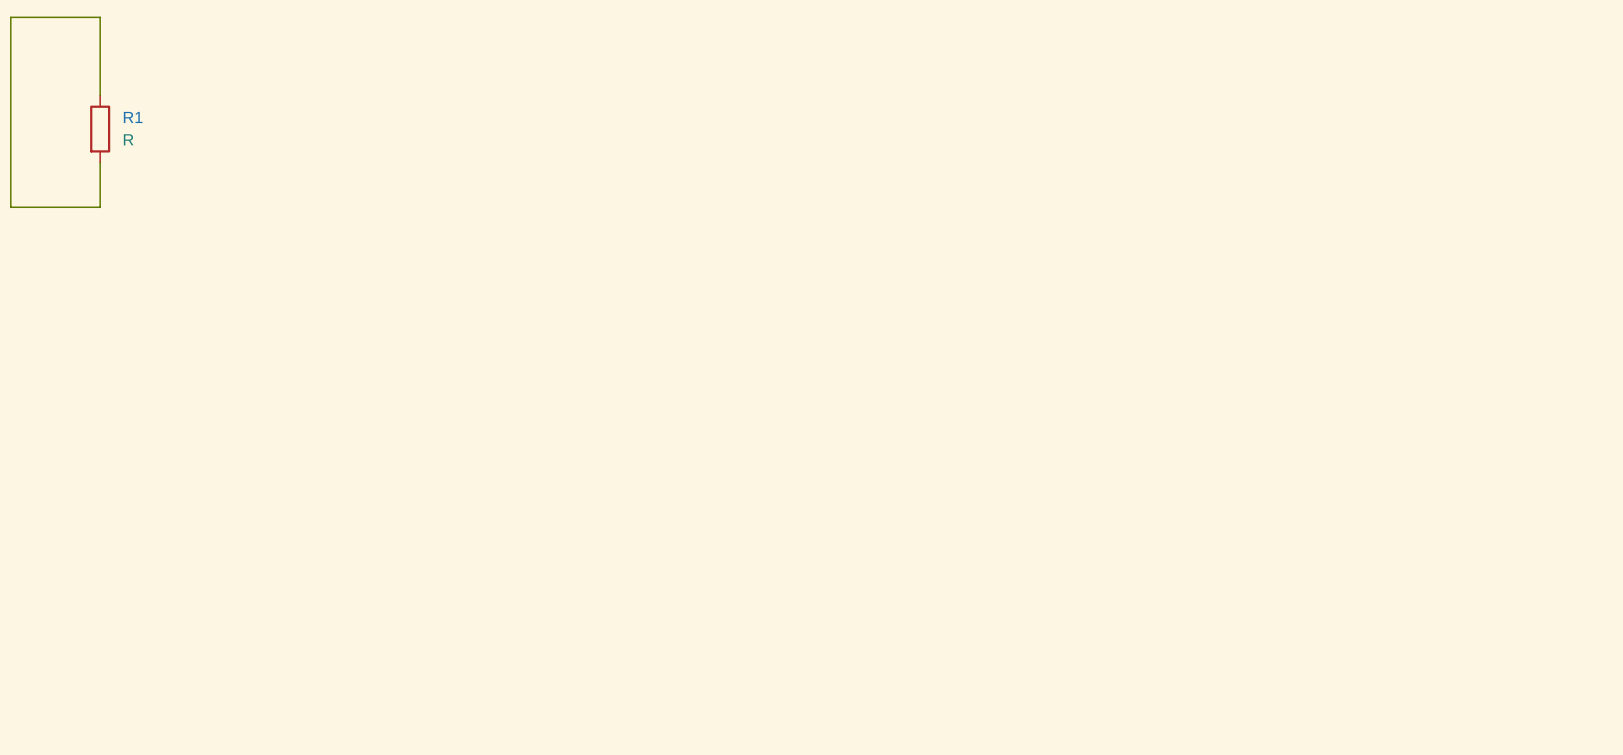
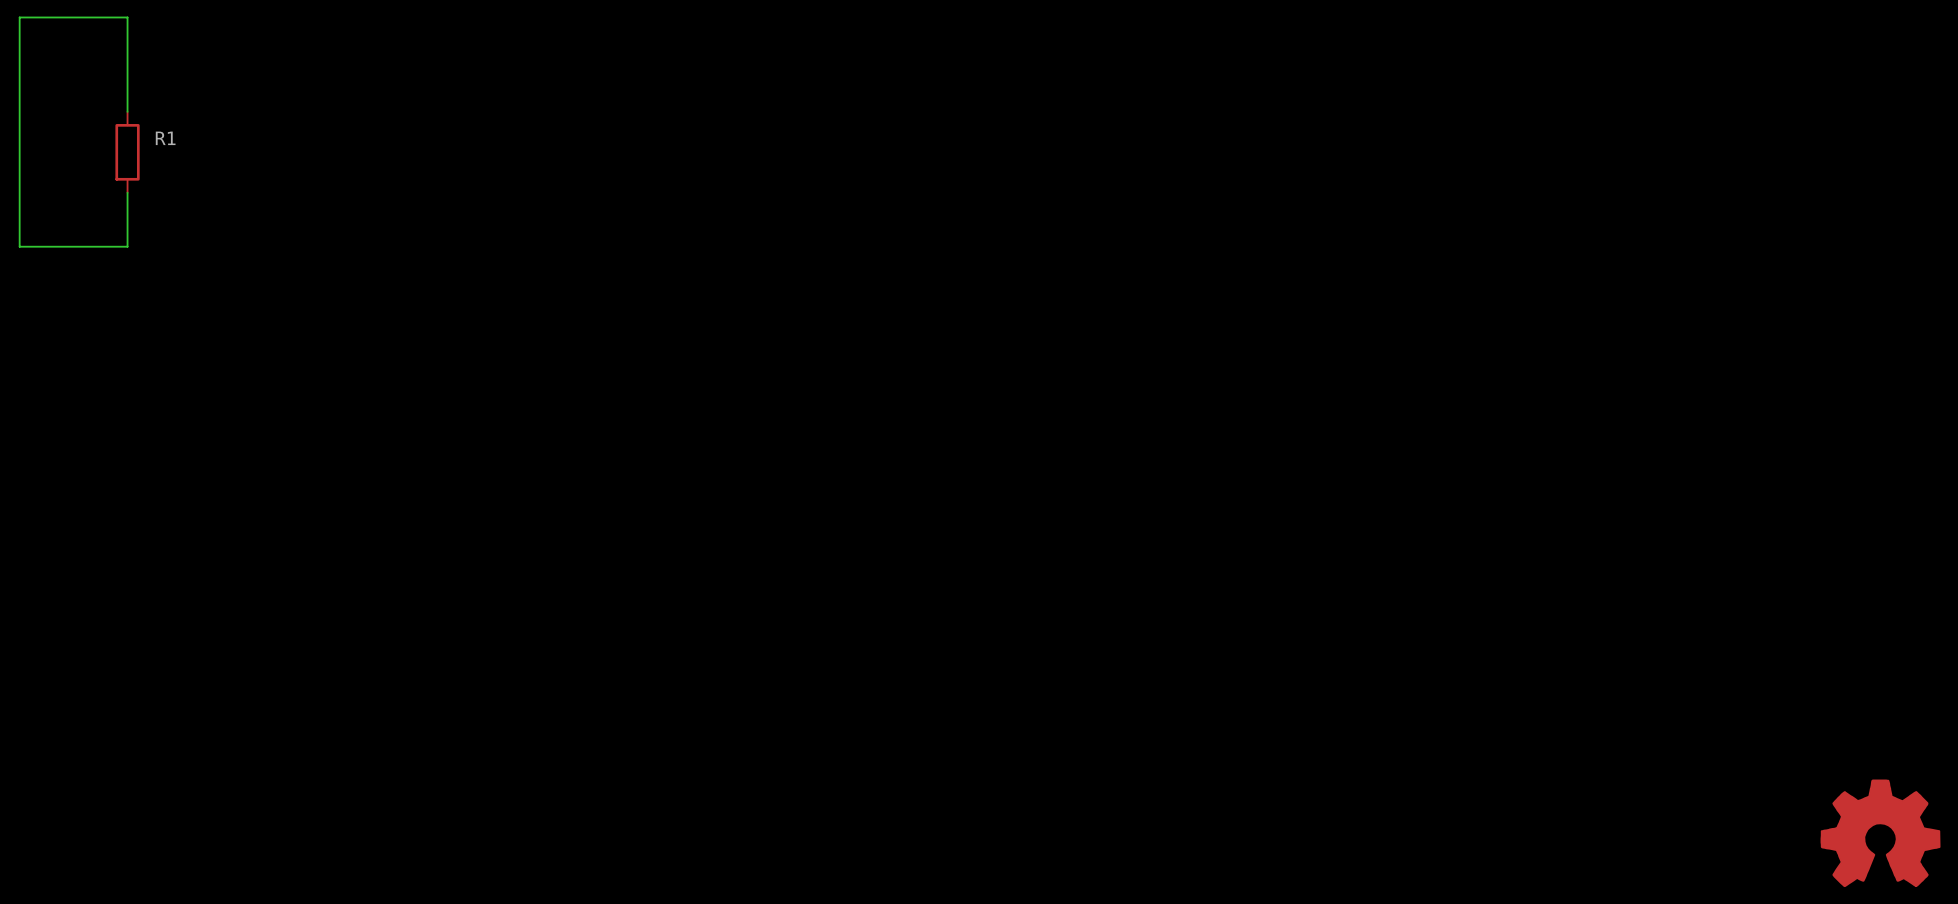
R1 value: R (128, 139) -> none
power symbol: none -> (1880, 833)

